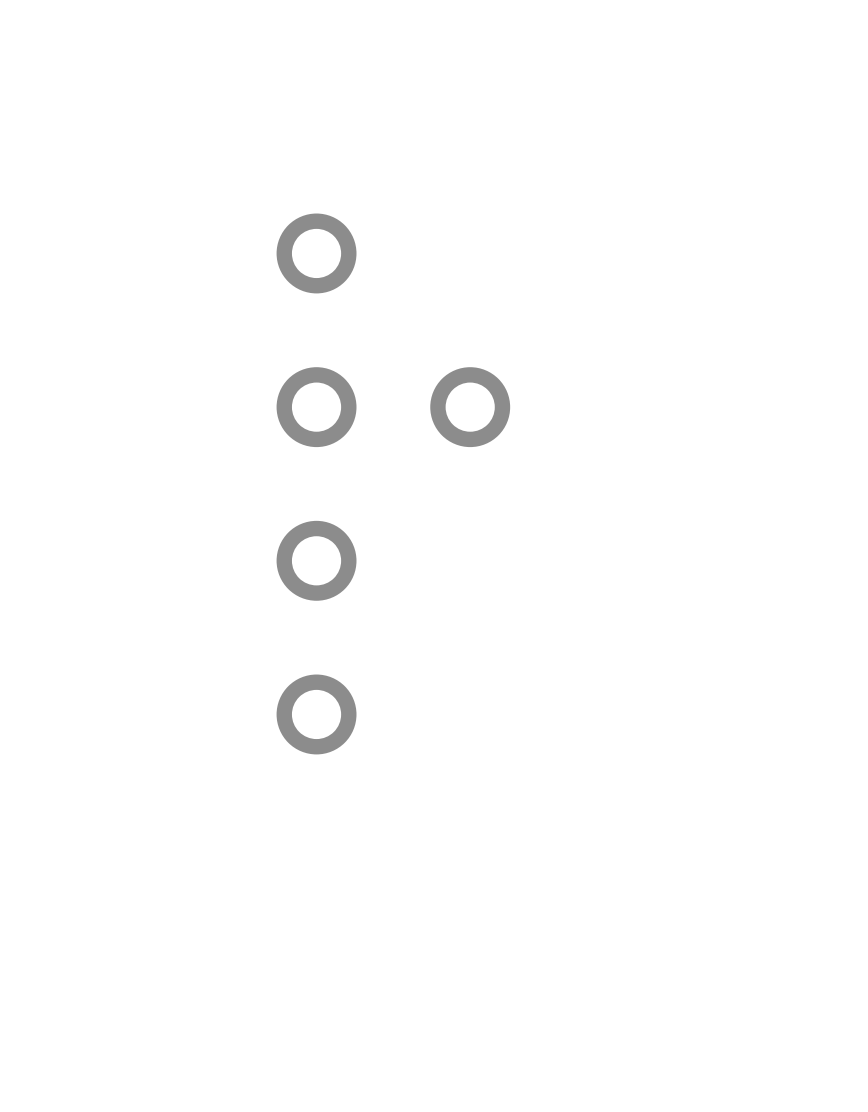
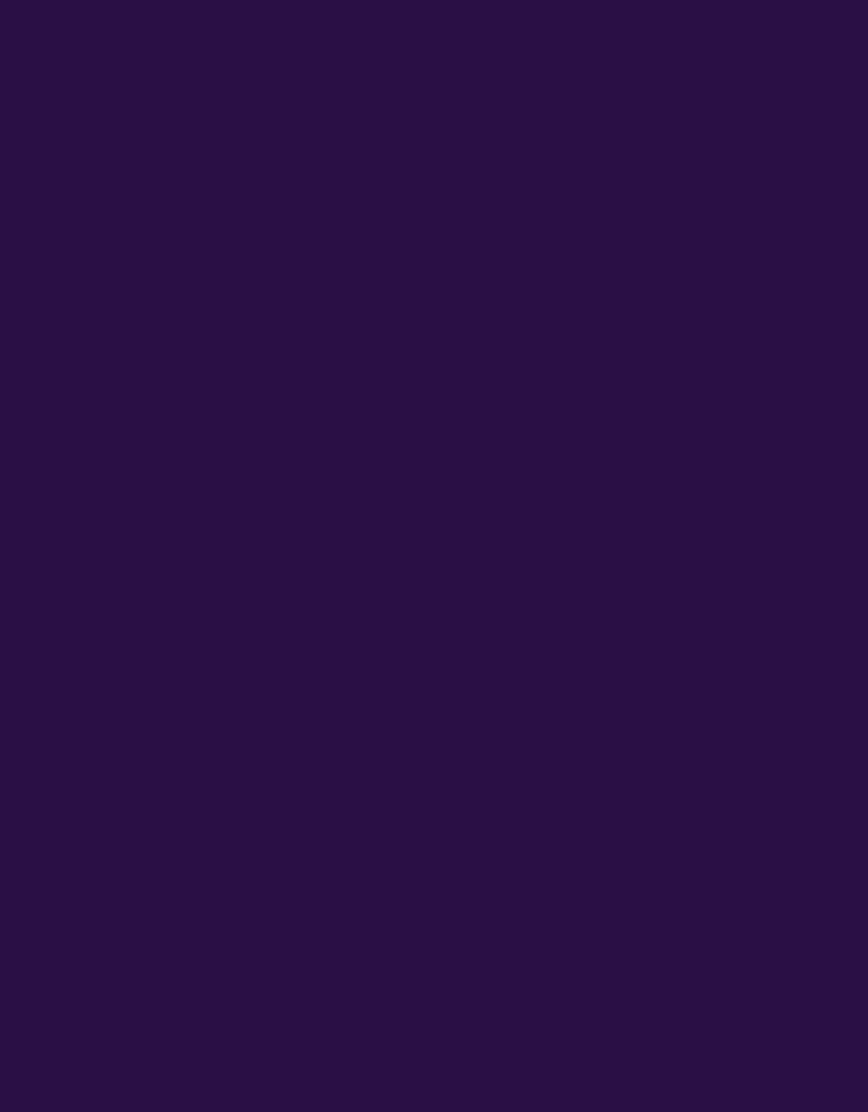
part: (393, 483) -> none

